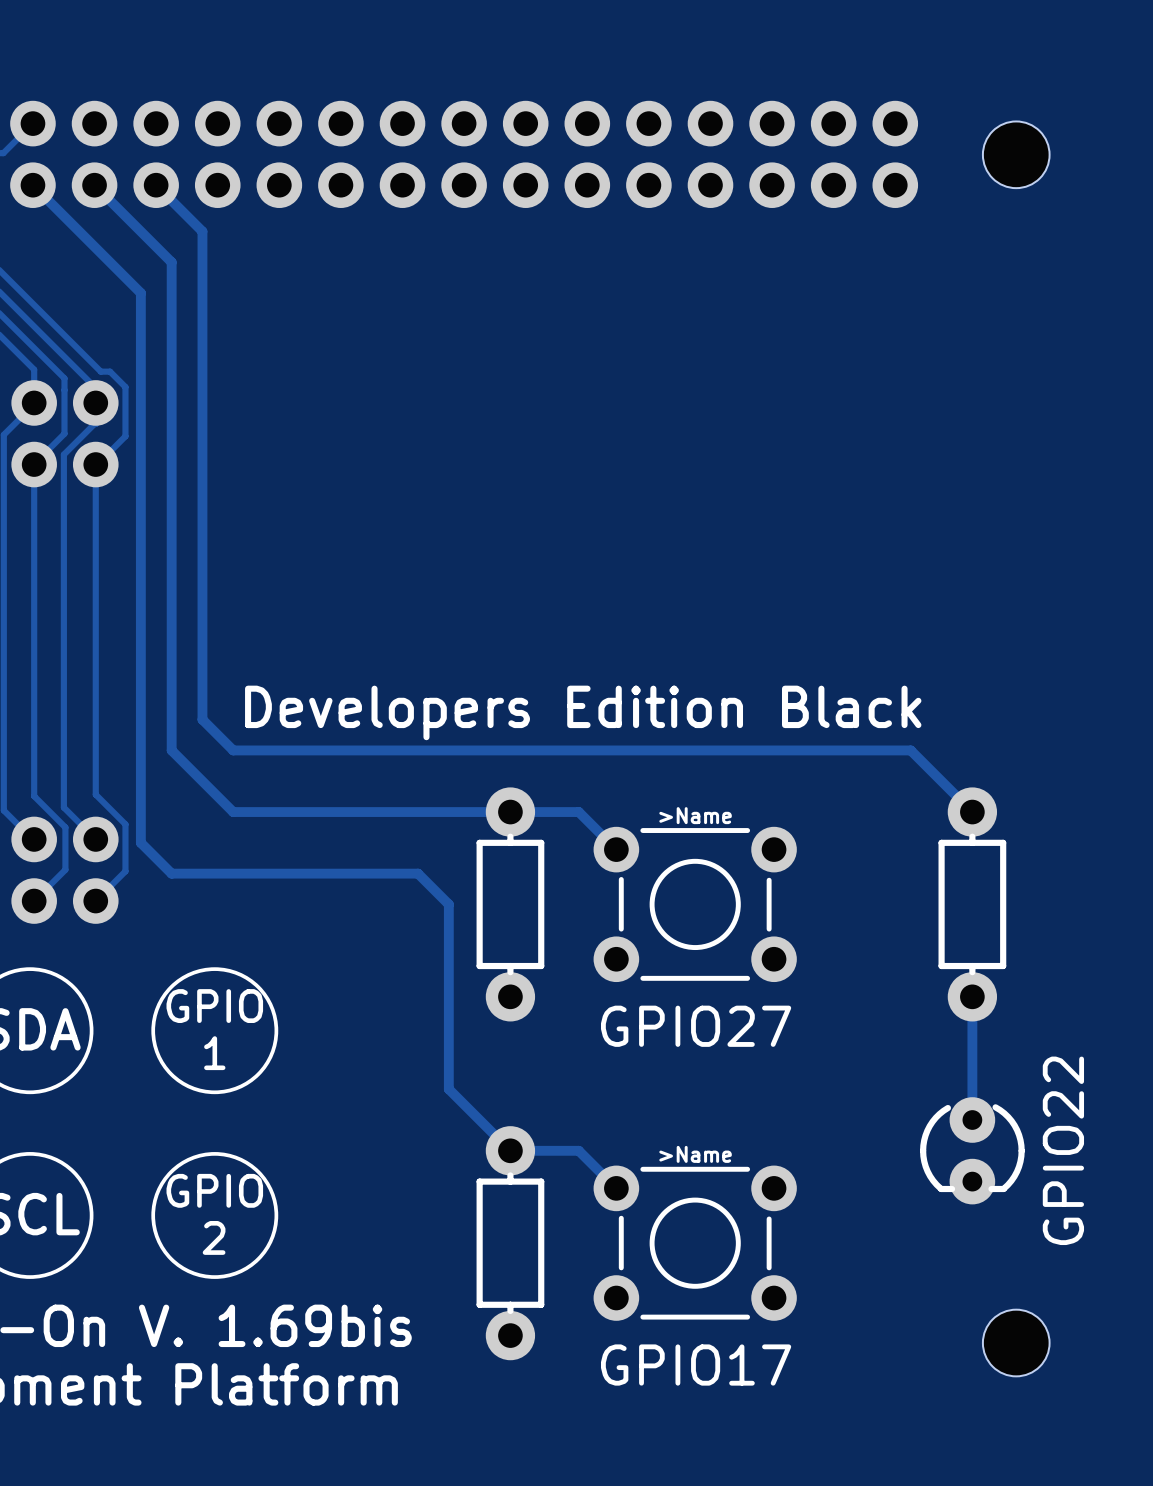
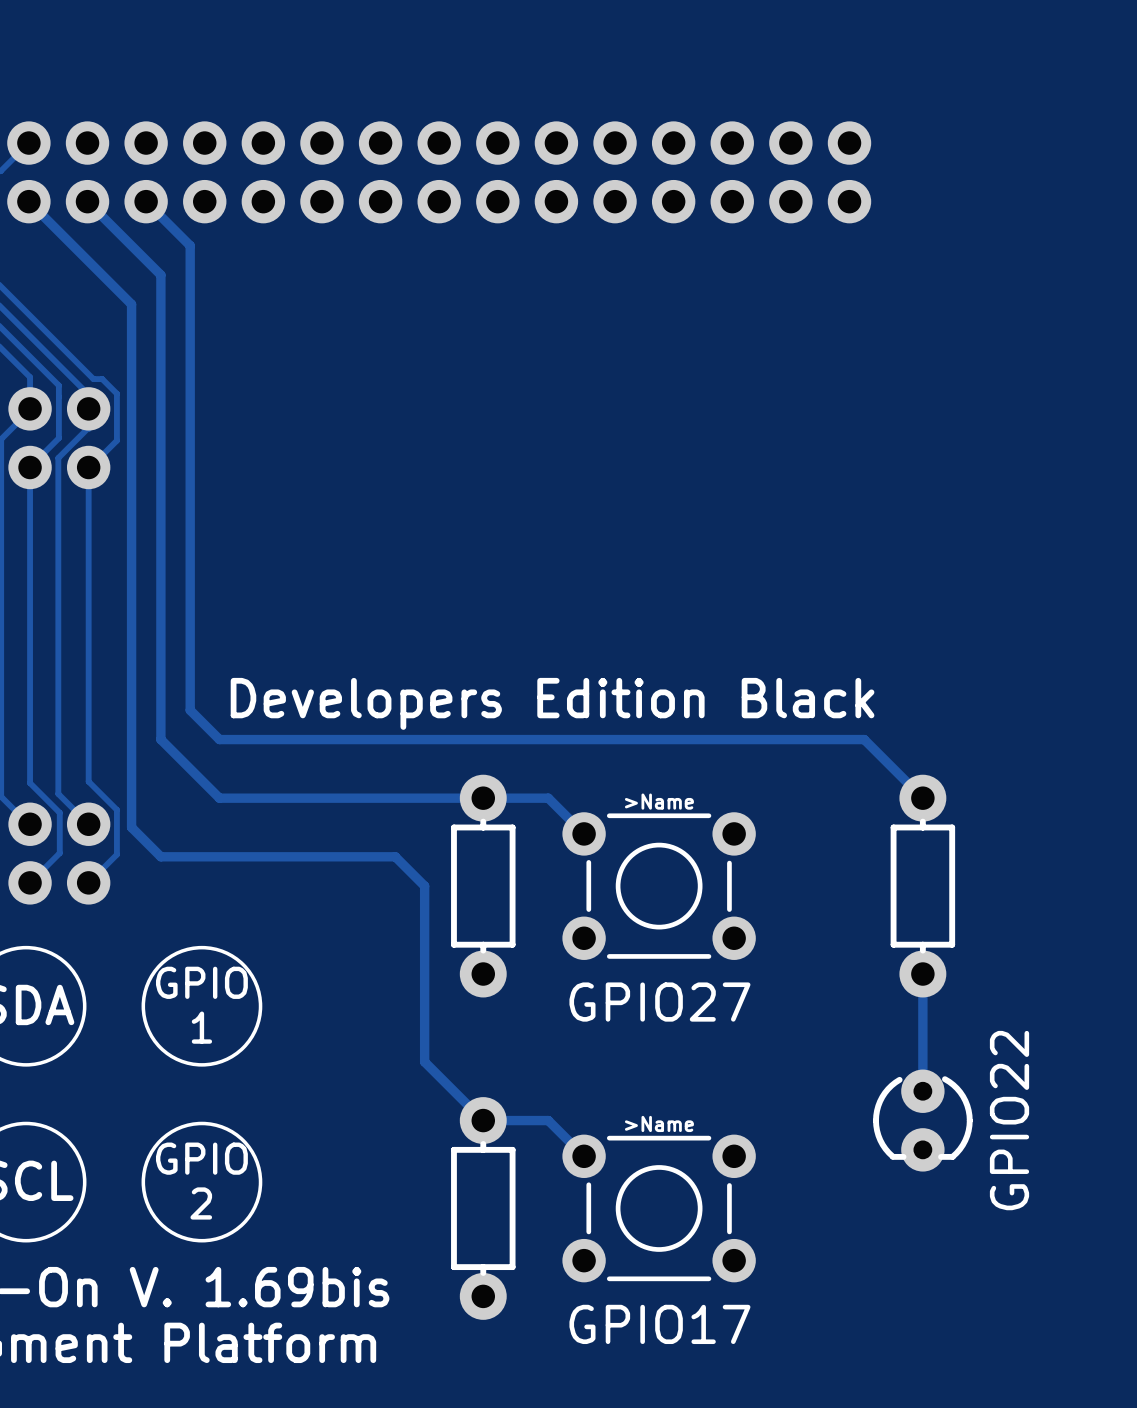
part: (1016, 154) -> none
part: (1016, 1343) -> none

